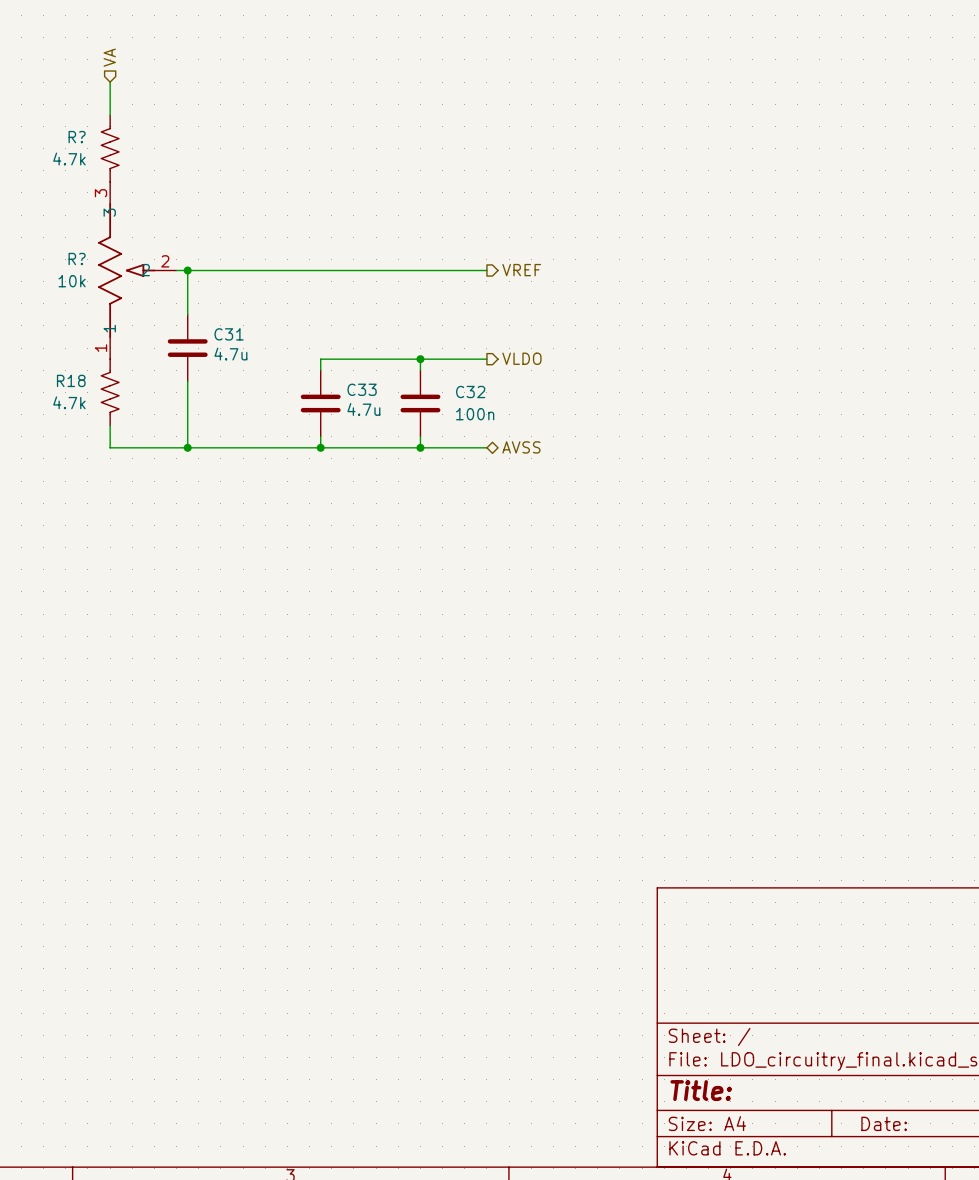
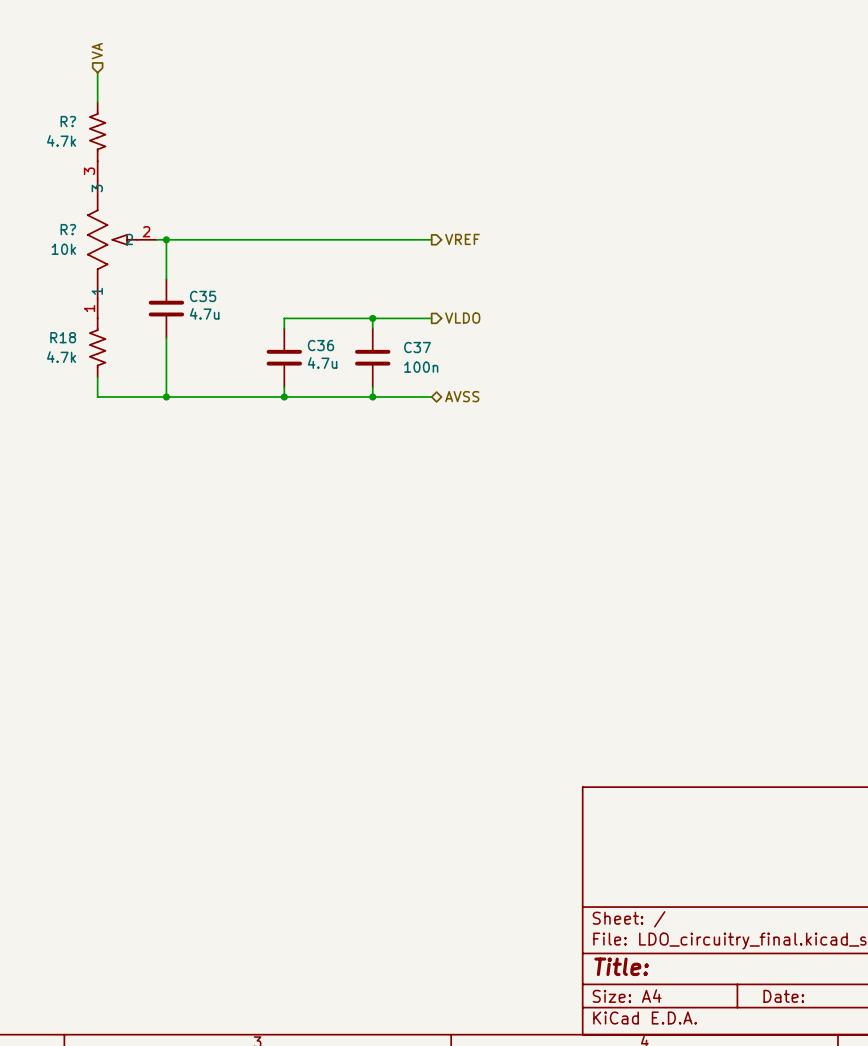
C31 name: C31 (229, 334) -> C35 (203, 296)
C33 name: C33 (362, 389) -> C36 (320, 345)
C32 name: C32 (470, 392) -> C37 (417, 347)

